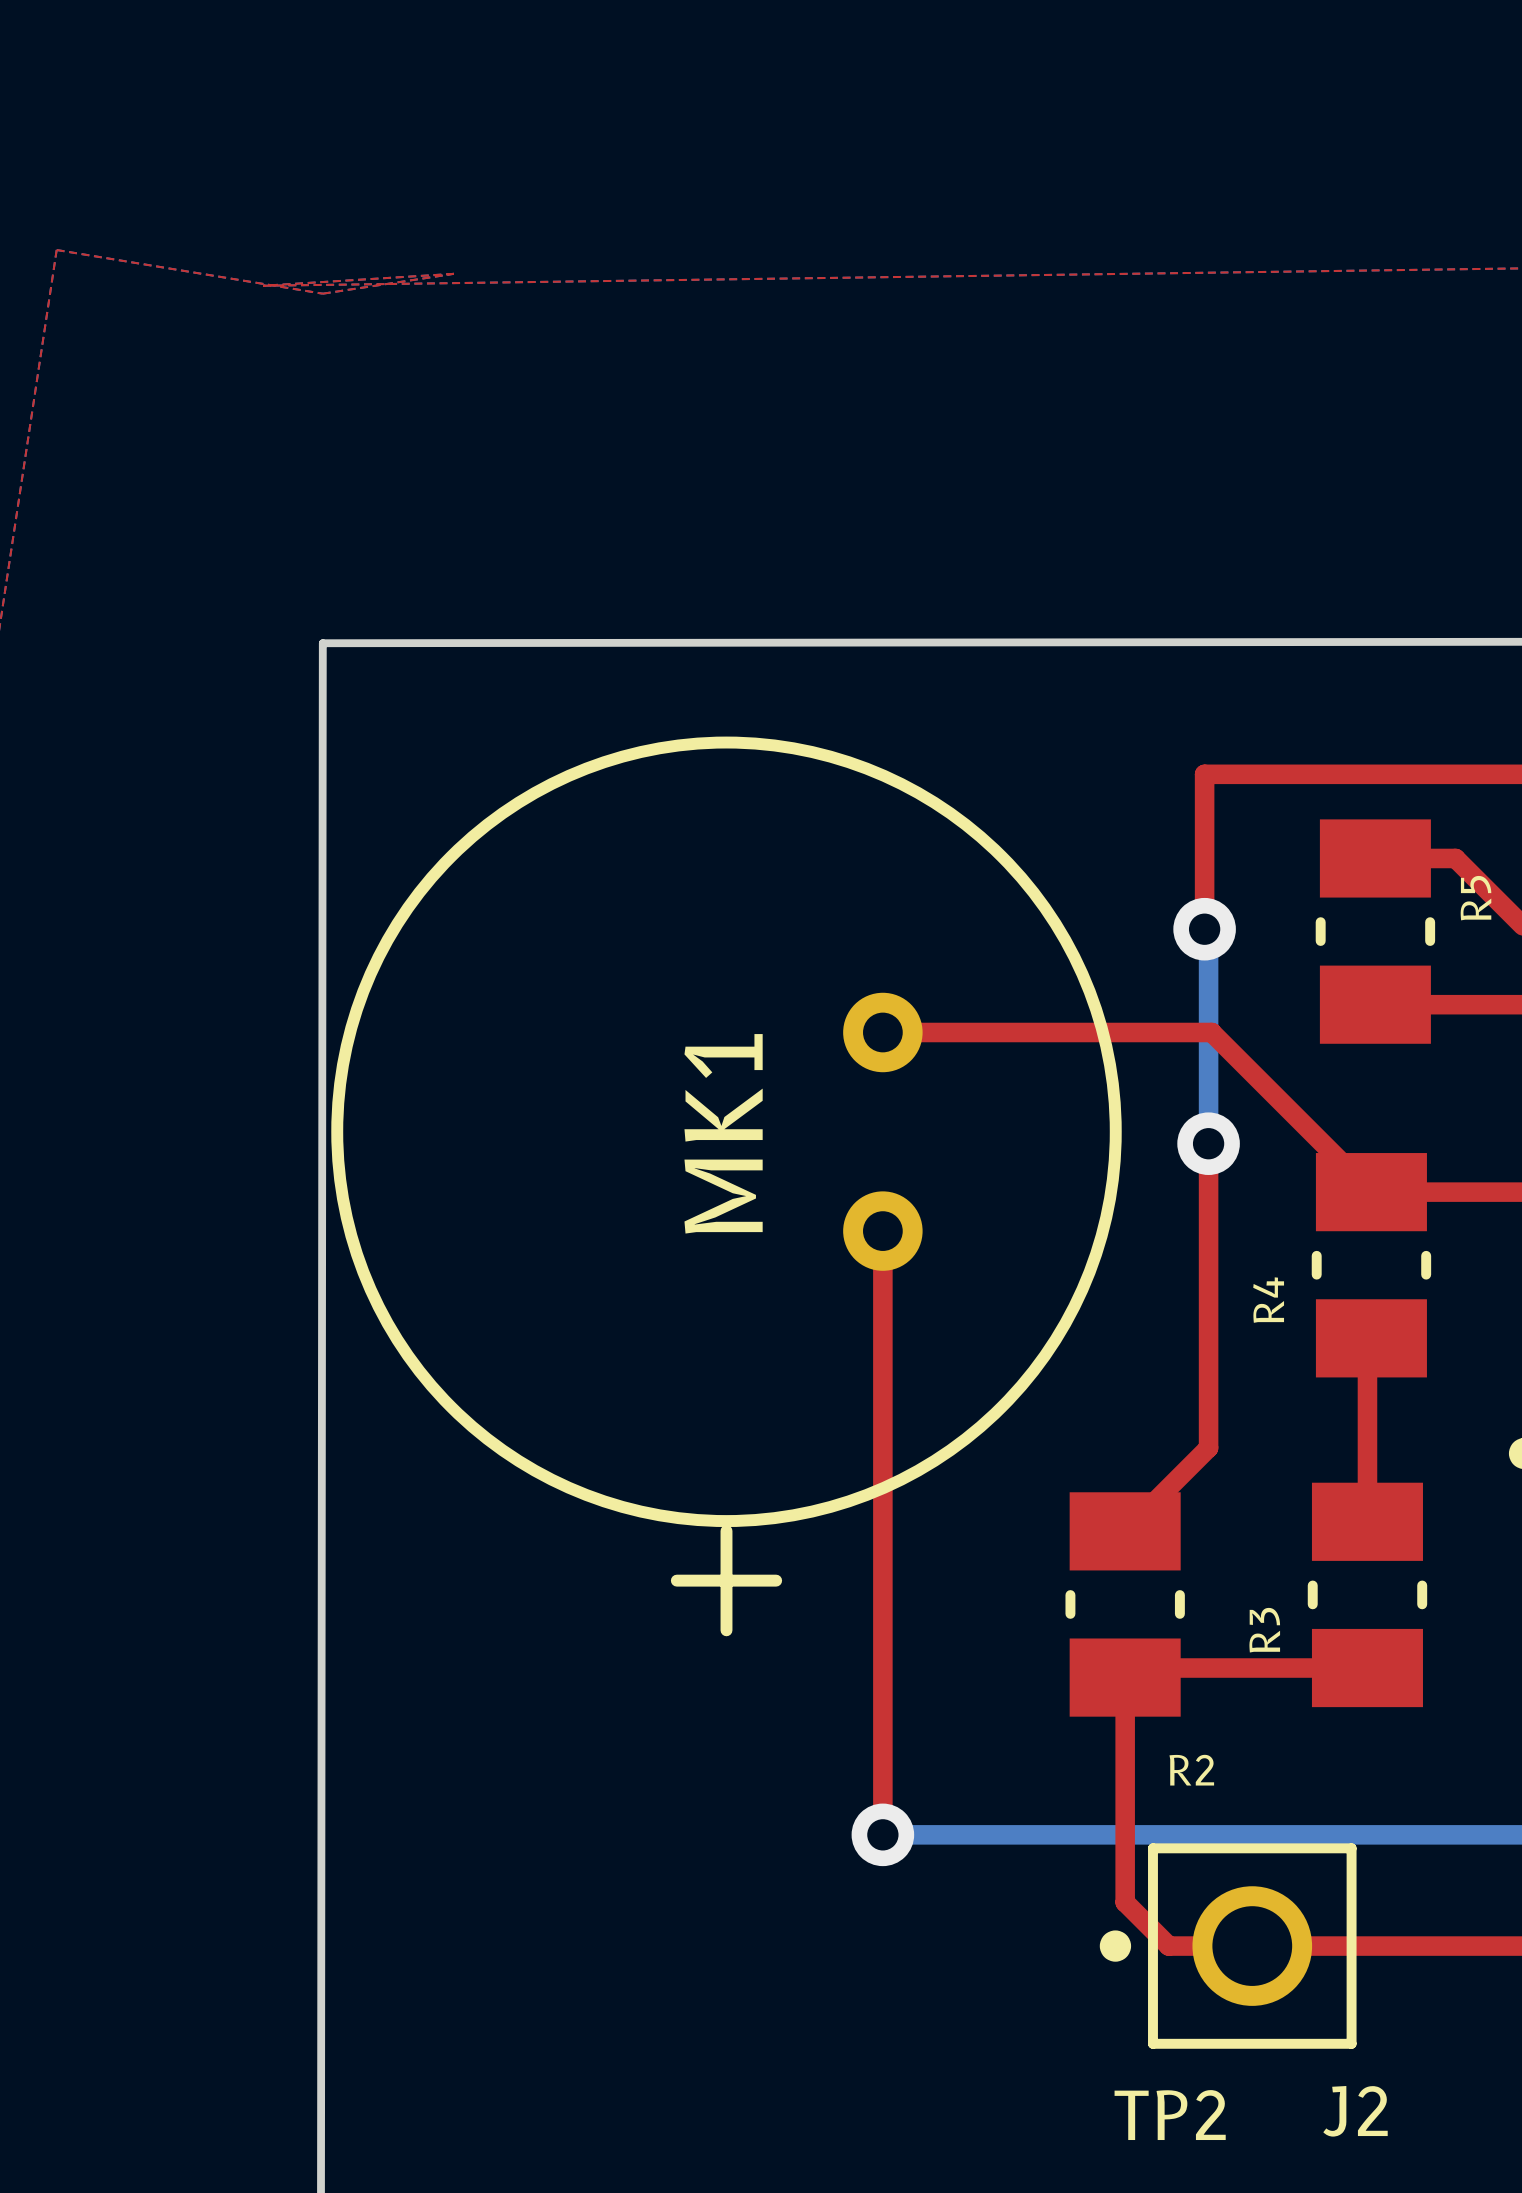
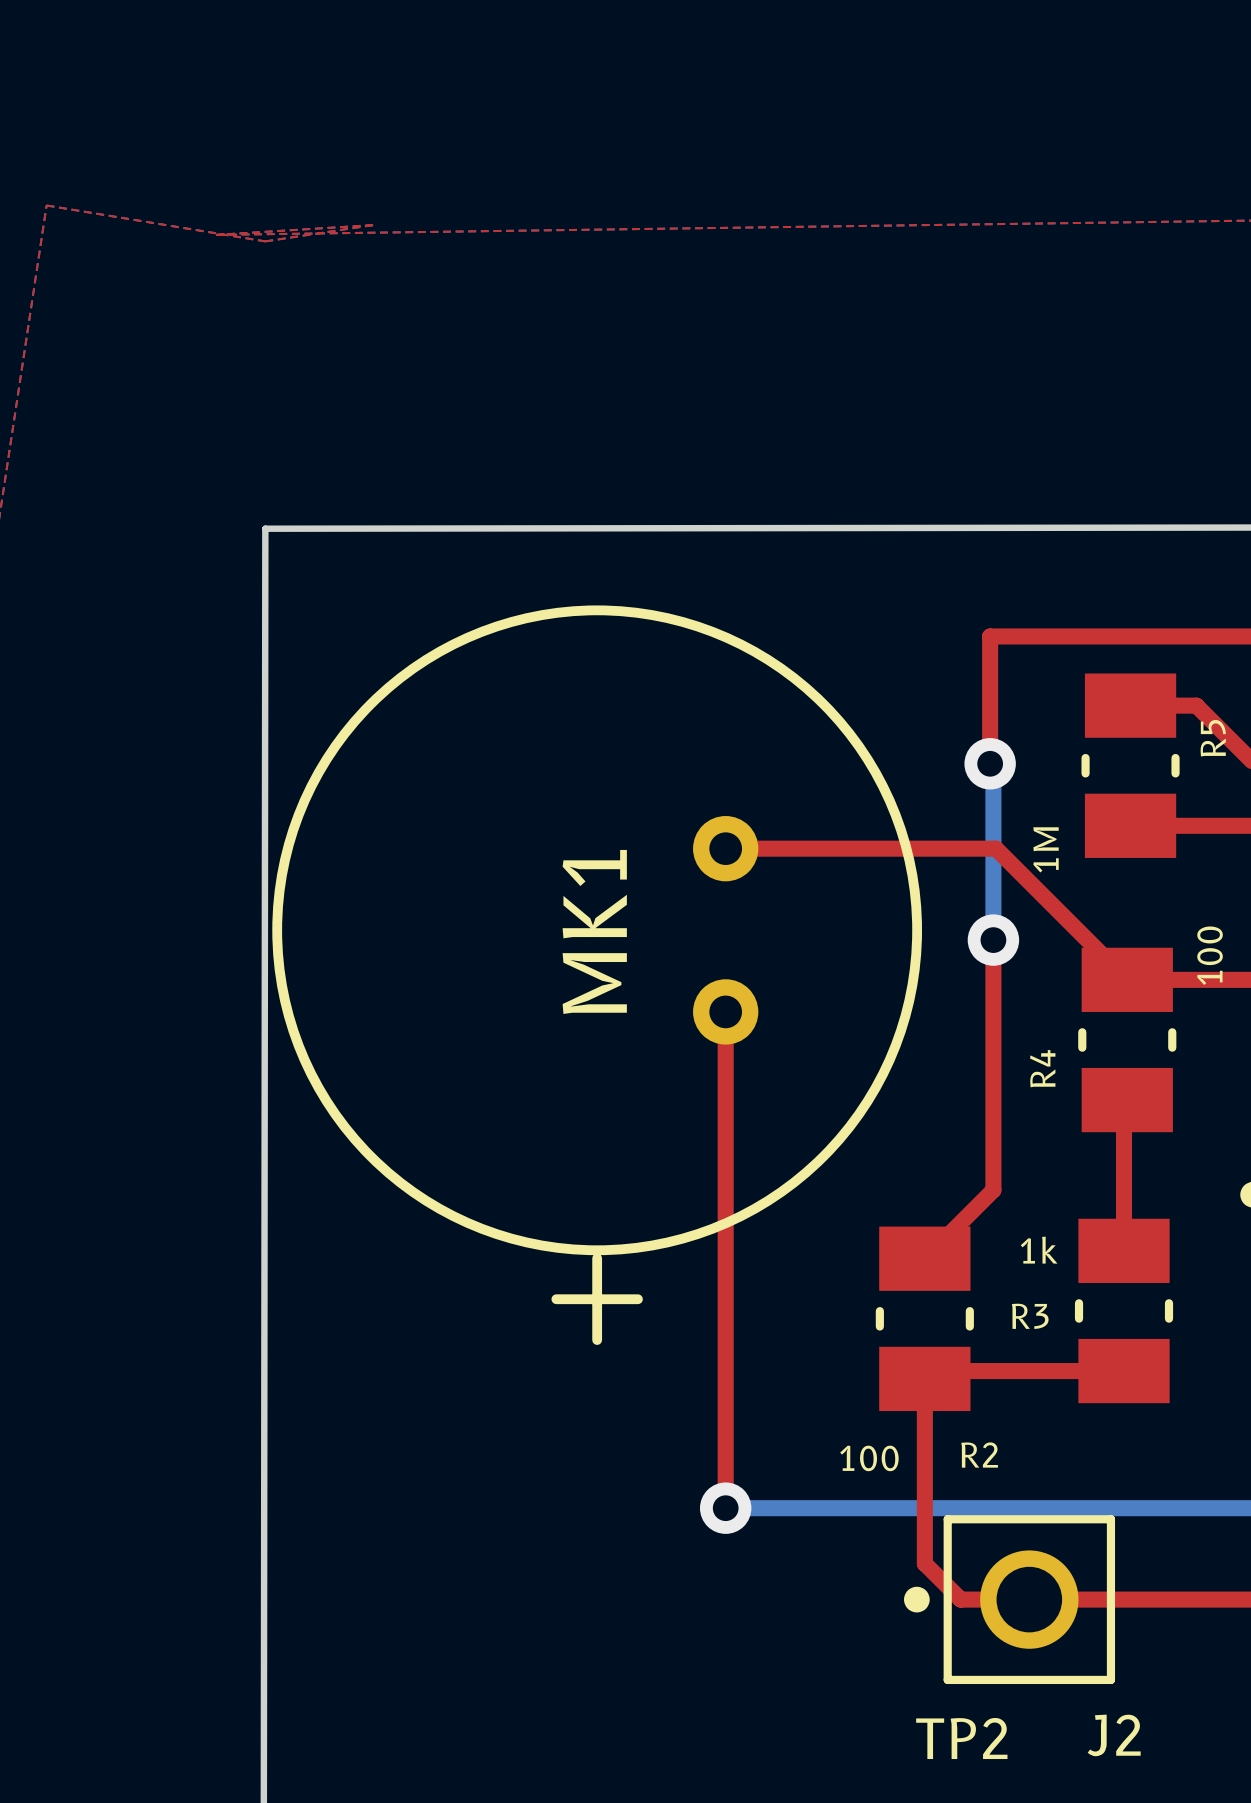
R5 value: none -> 1M (1046, 849)
R4 value: none -> 100 (1210, 955)
R3 value: none -> 1k (1039, 1250)
R3 name rotation: 0° (1264, 1630) -> 90° clockwise (1030, 1316)
R2 value: none -> 100 (869, 1458)

